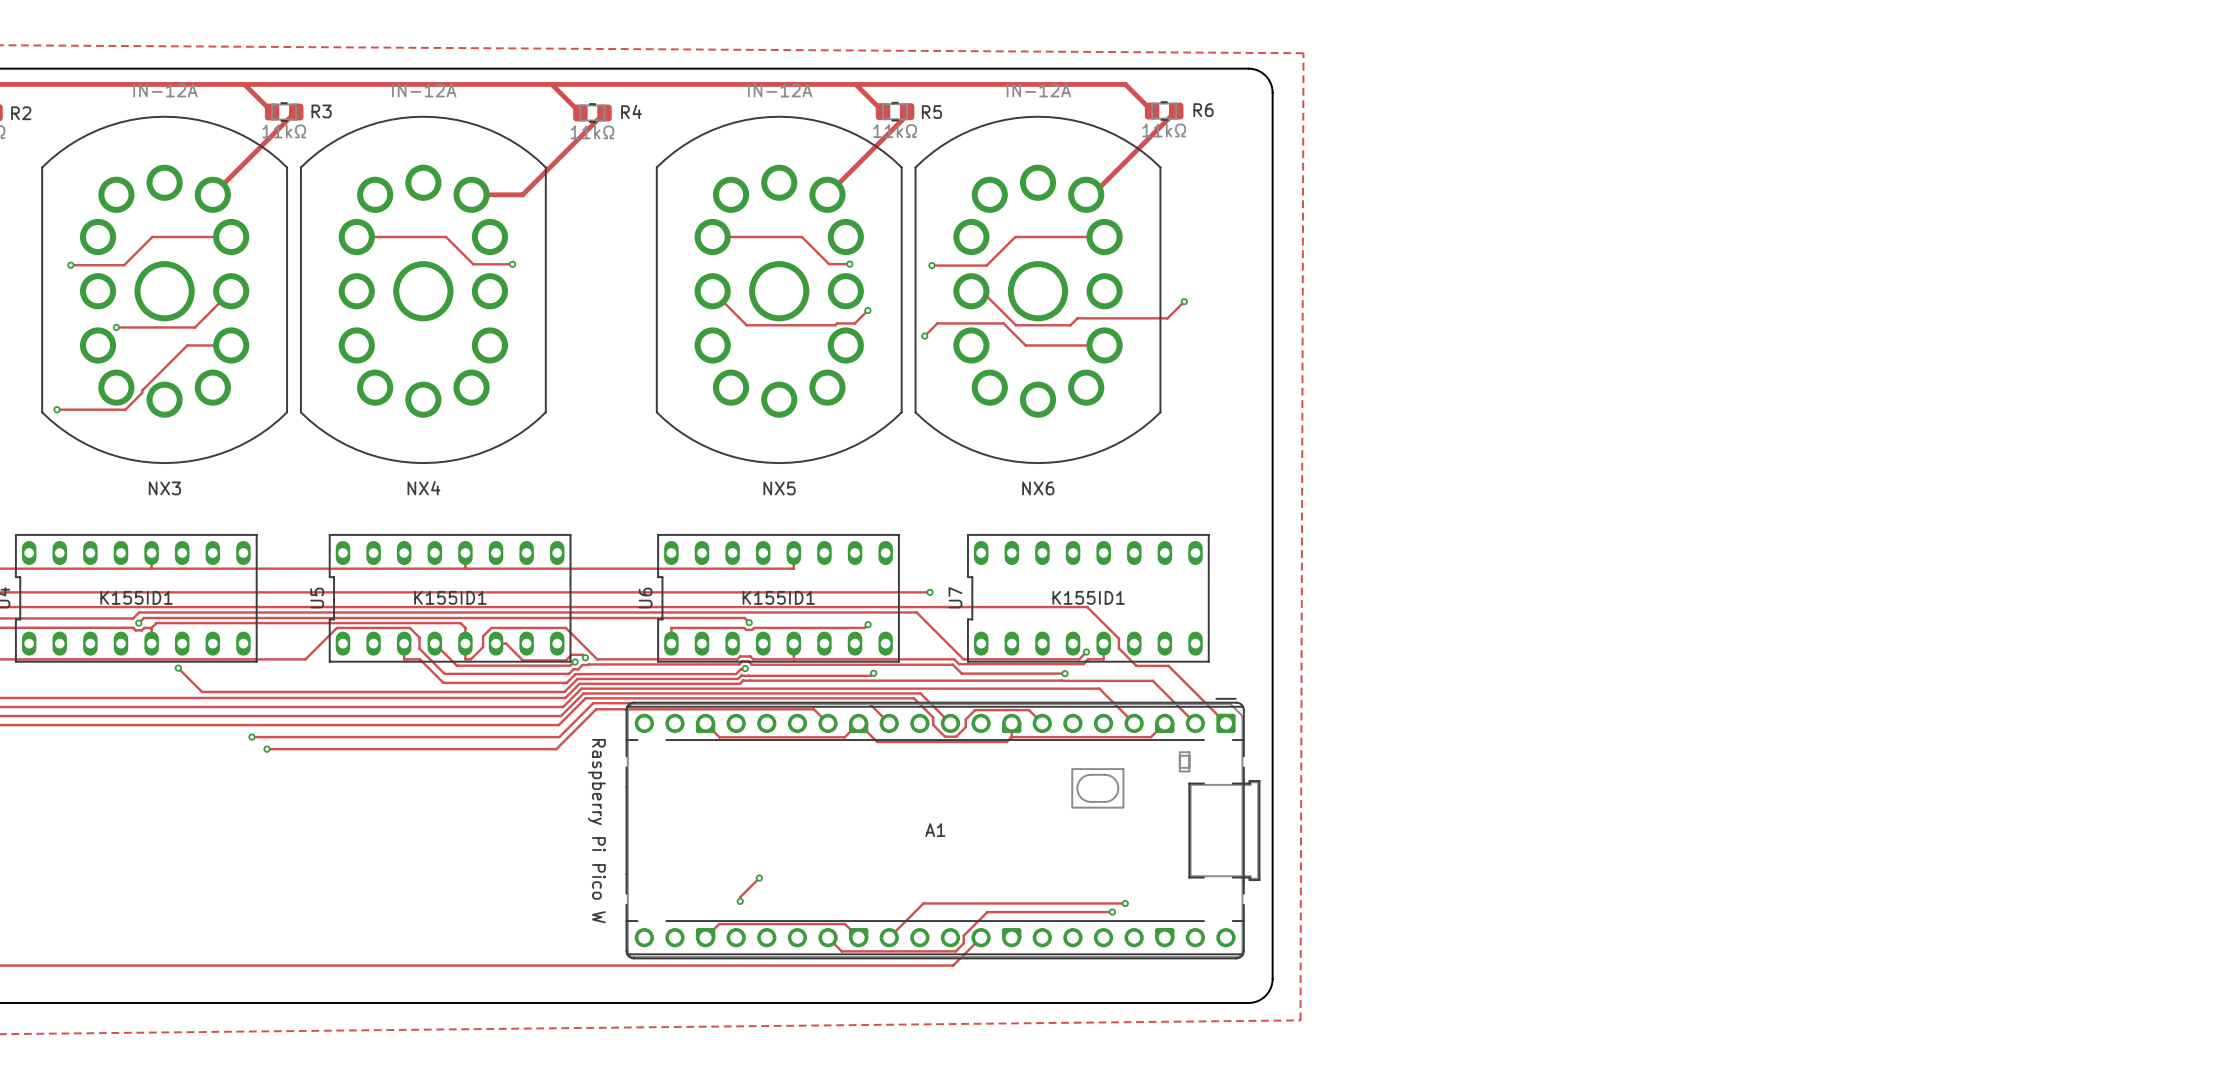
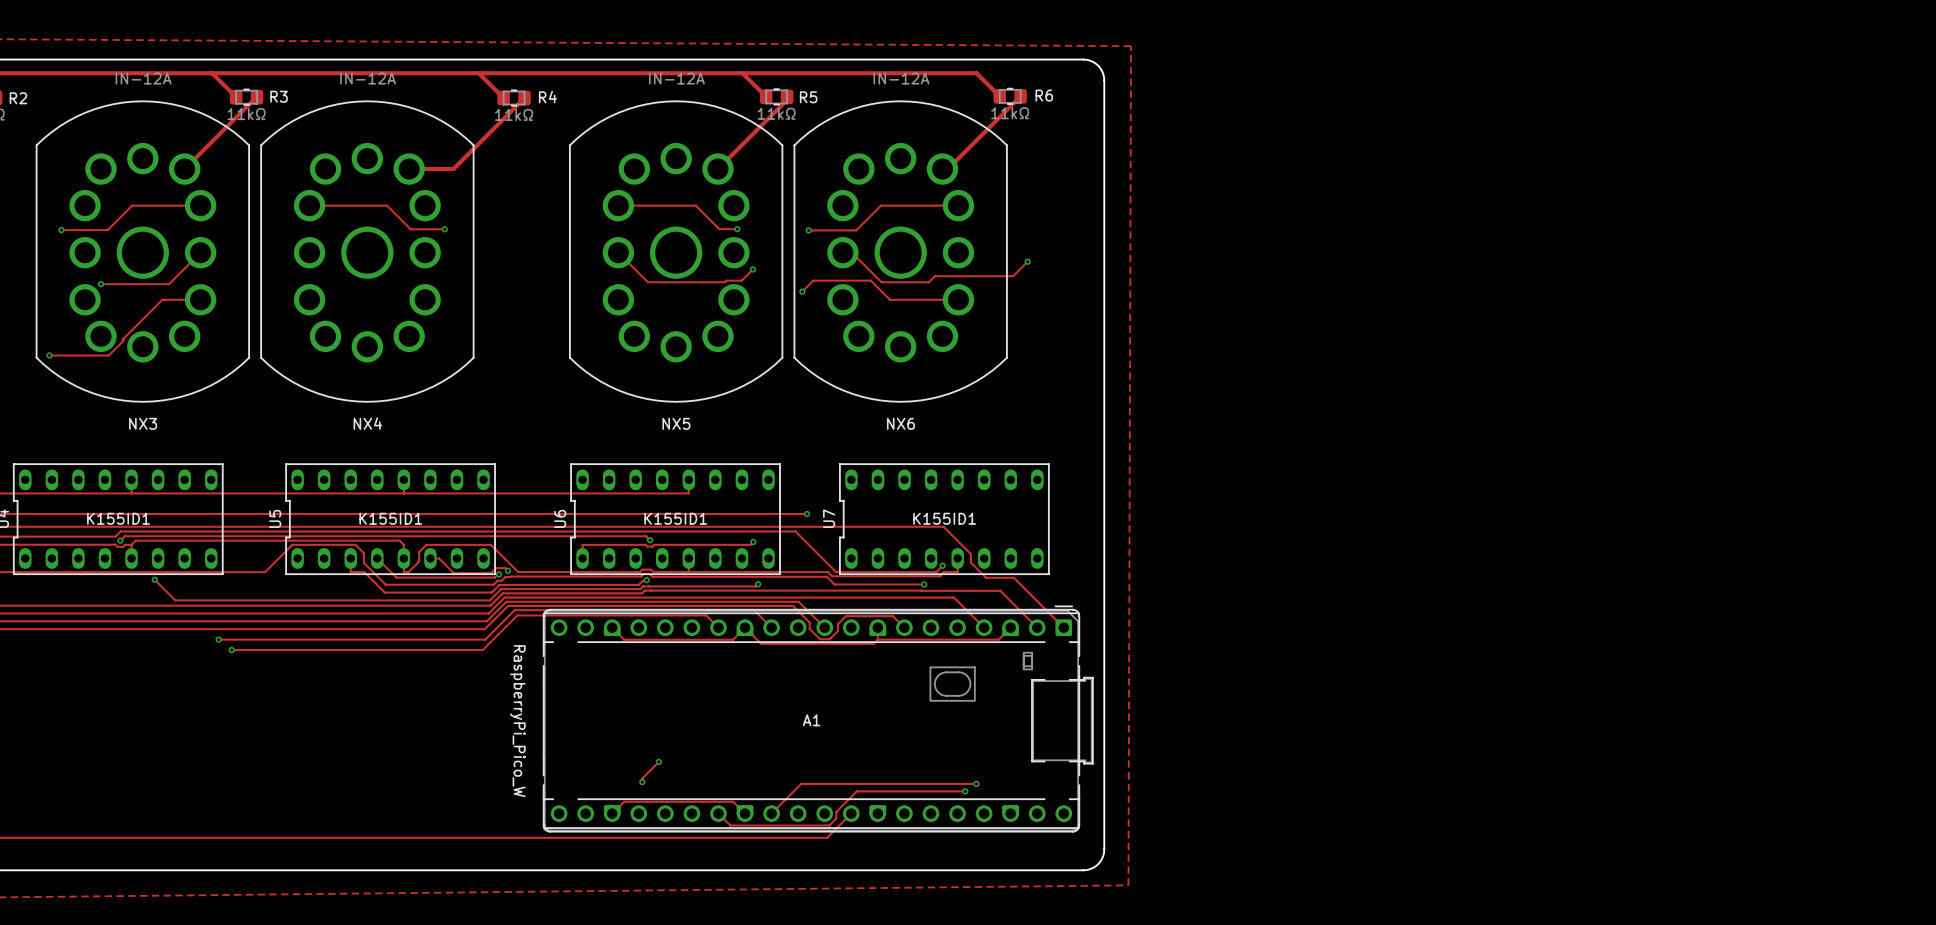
A1 value: Raspberry Pi Pico W (596, 831) -> RaspberryPi_Pico_W (517, 721)

